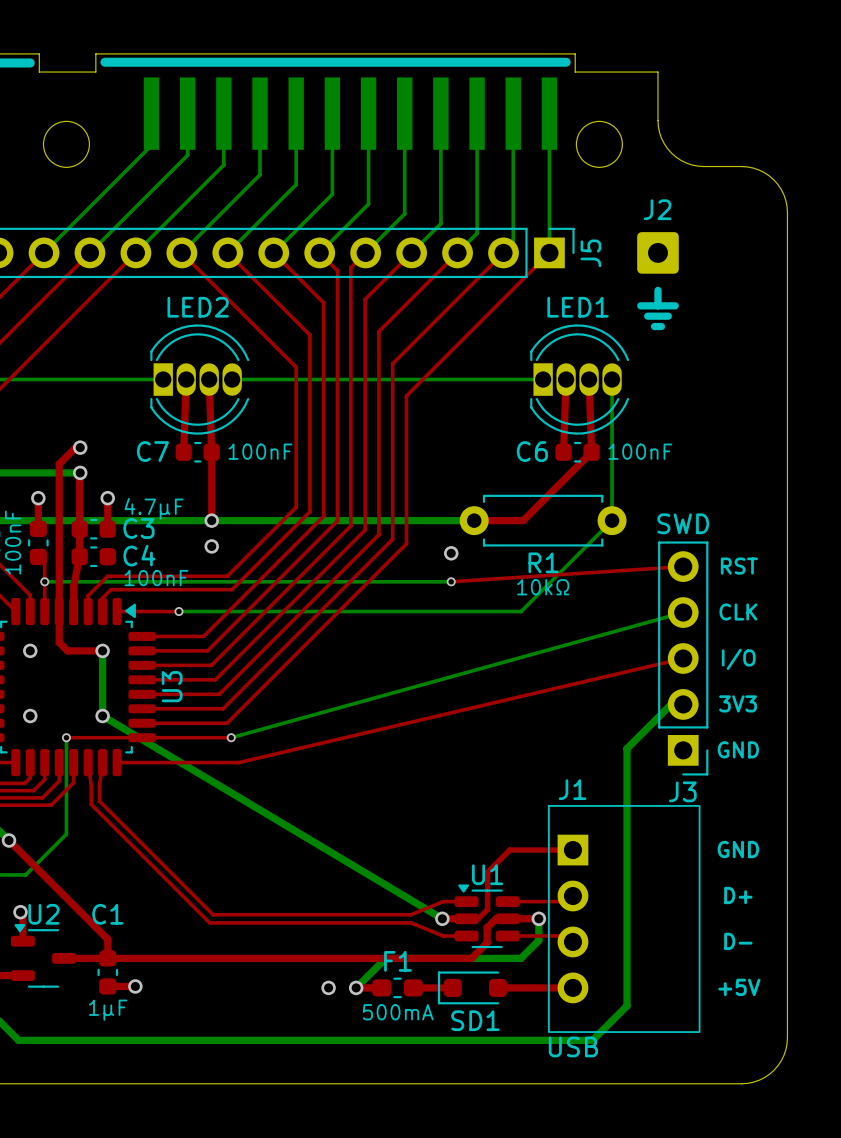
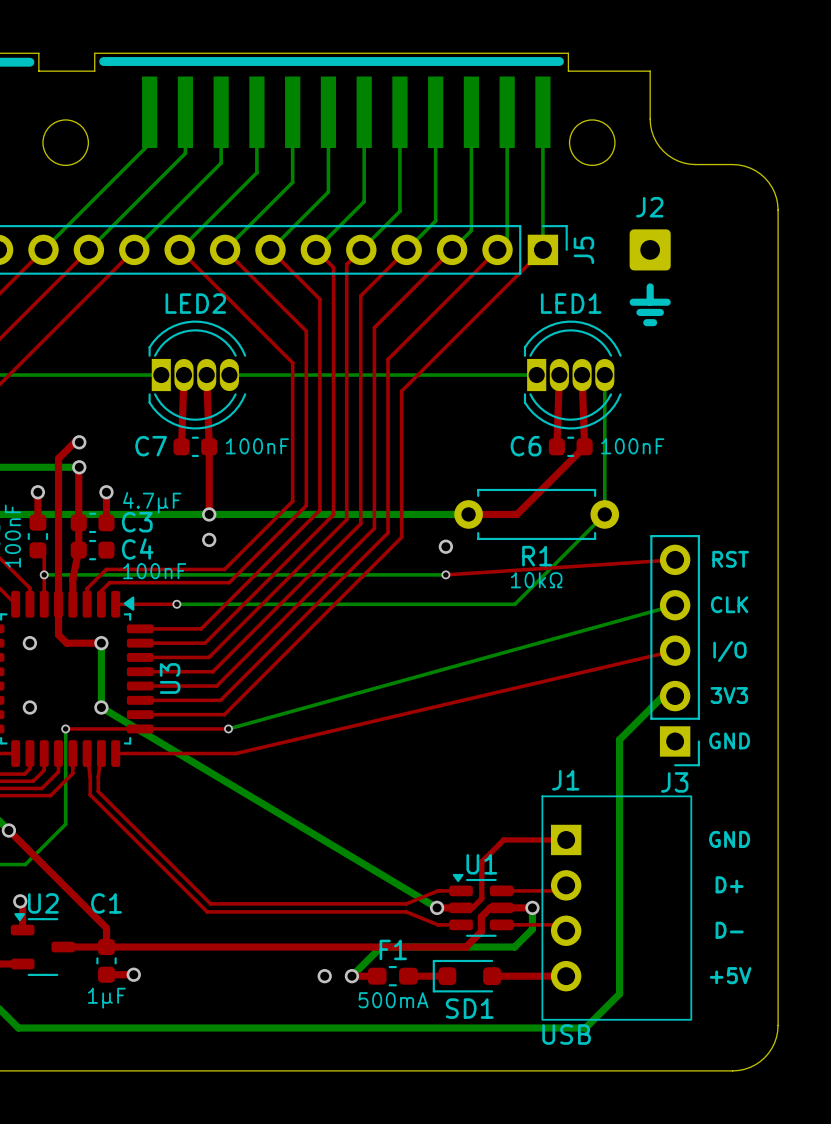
J3 value: SWD (683, 523) -> none

